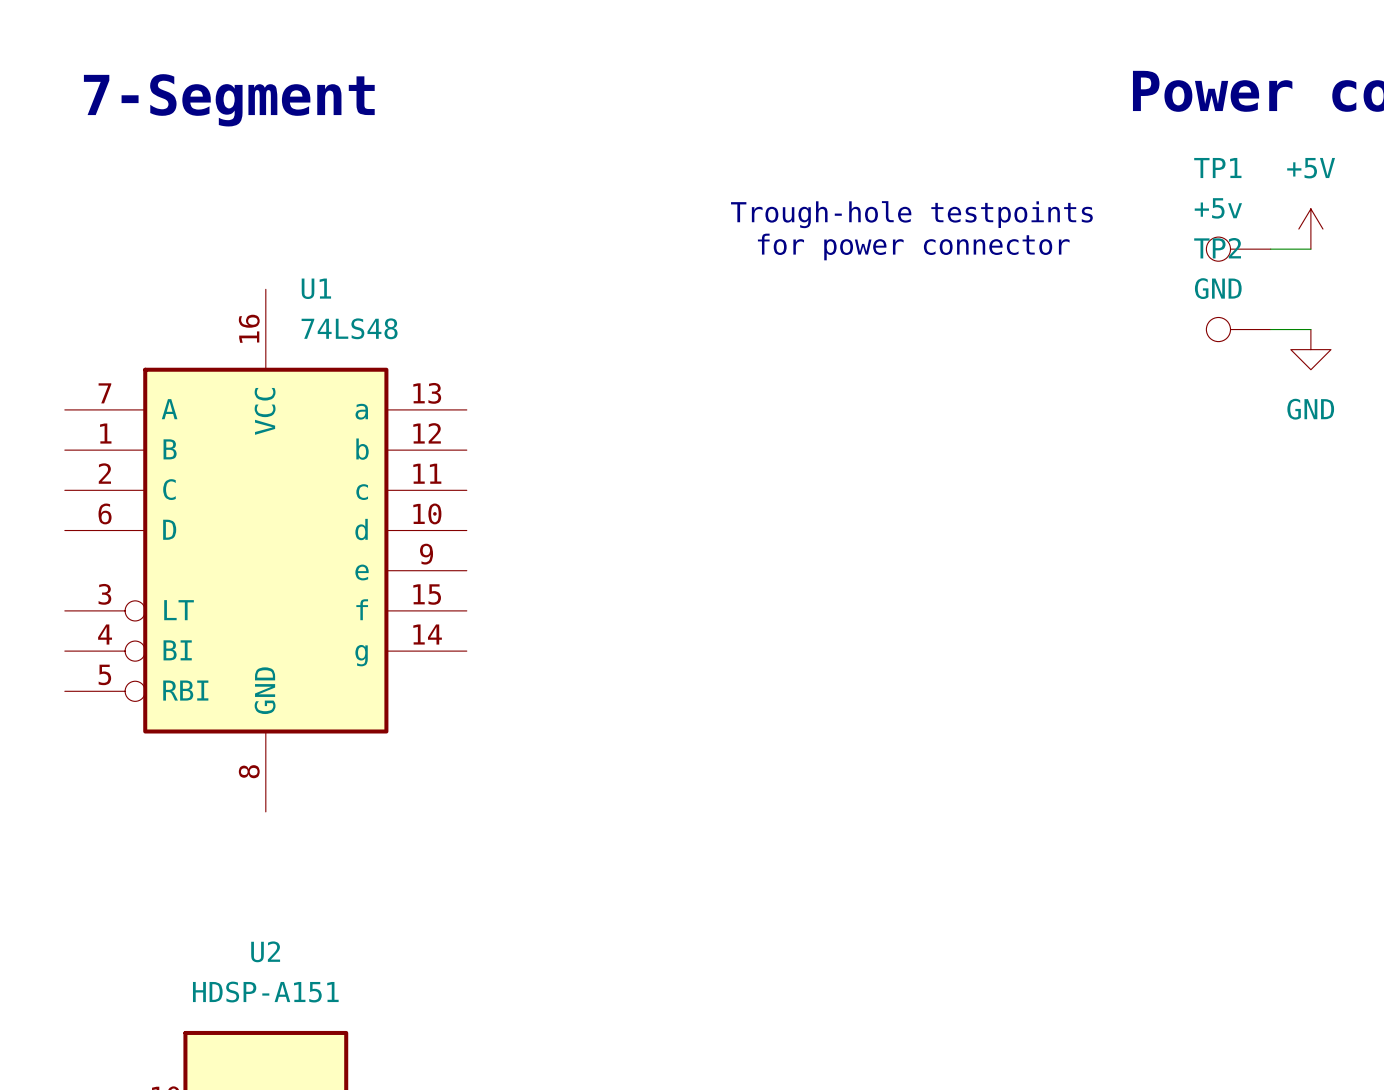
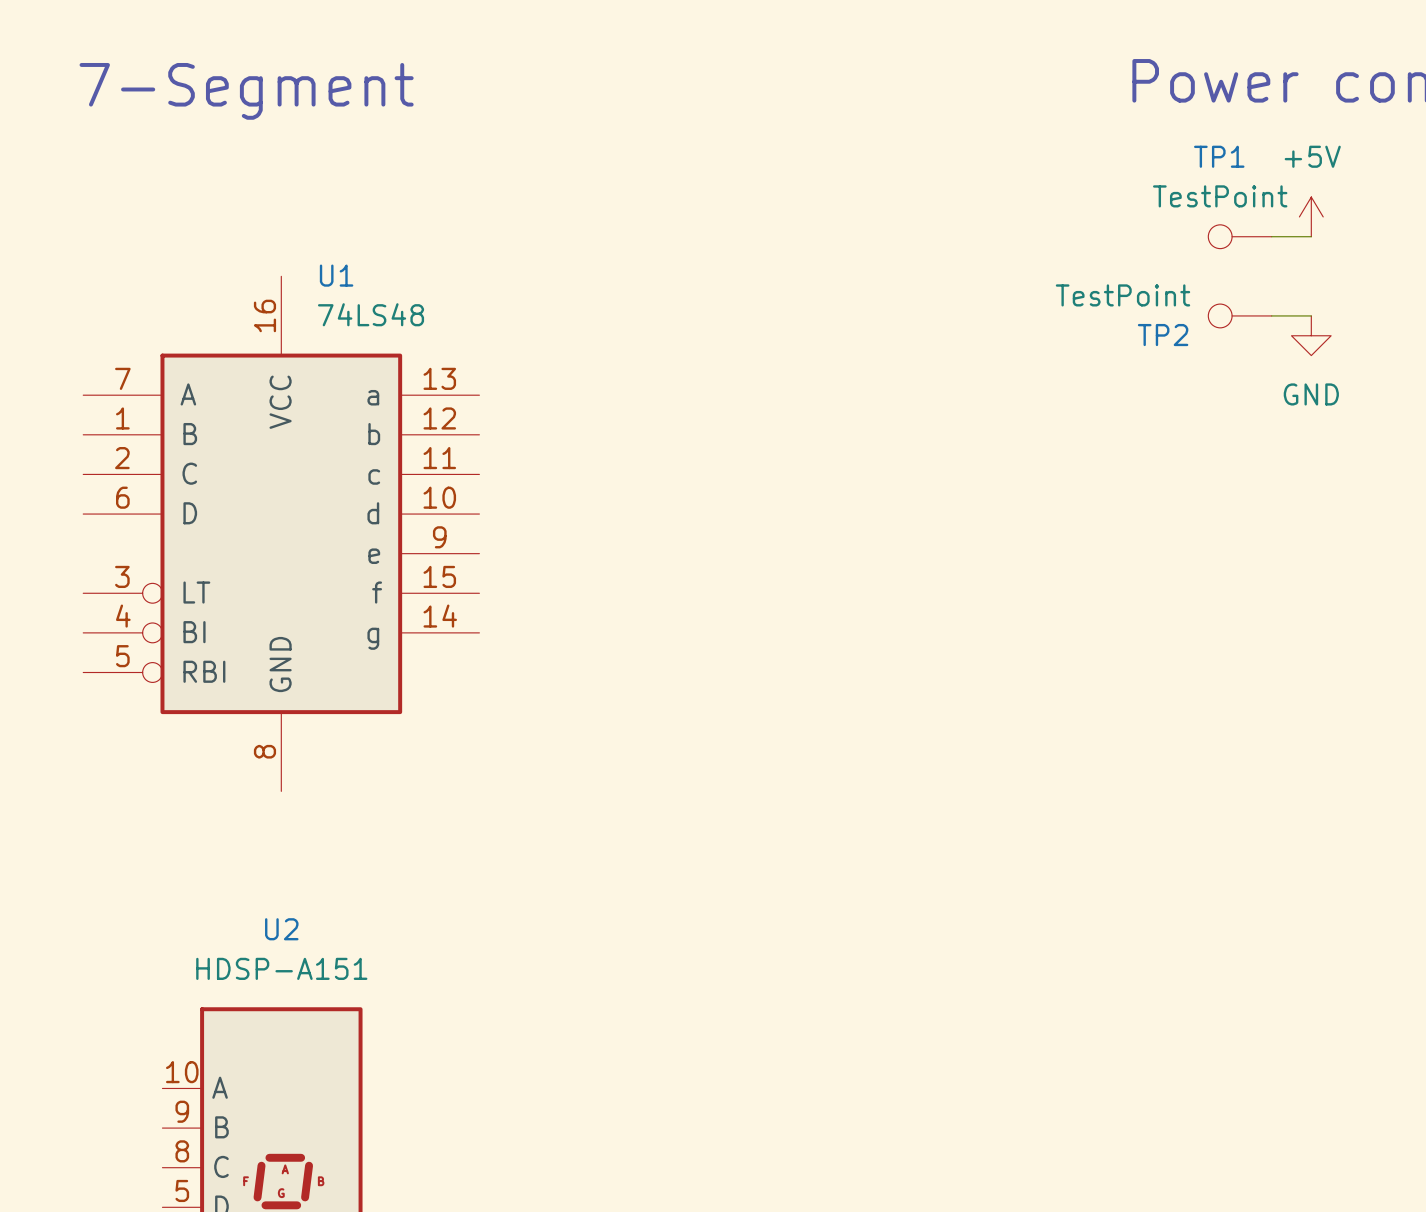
TP1 value: +5v (1218, 208) -> TestPoint (1220, 196)
text: Trough-hole testpoints (911, 214) -> none
text: for power connector (913, 246) -> none
TP2 name position: TP2 (1217, 248) -> TP2 (1163, 335)
TP2 value: GND (1218, 288) -> TestPoint (1122, 295)

